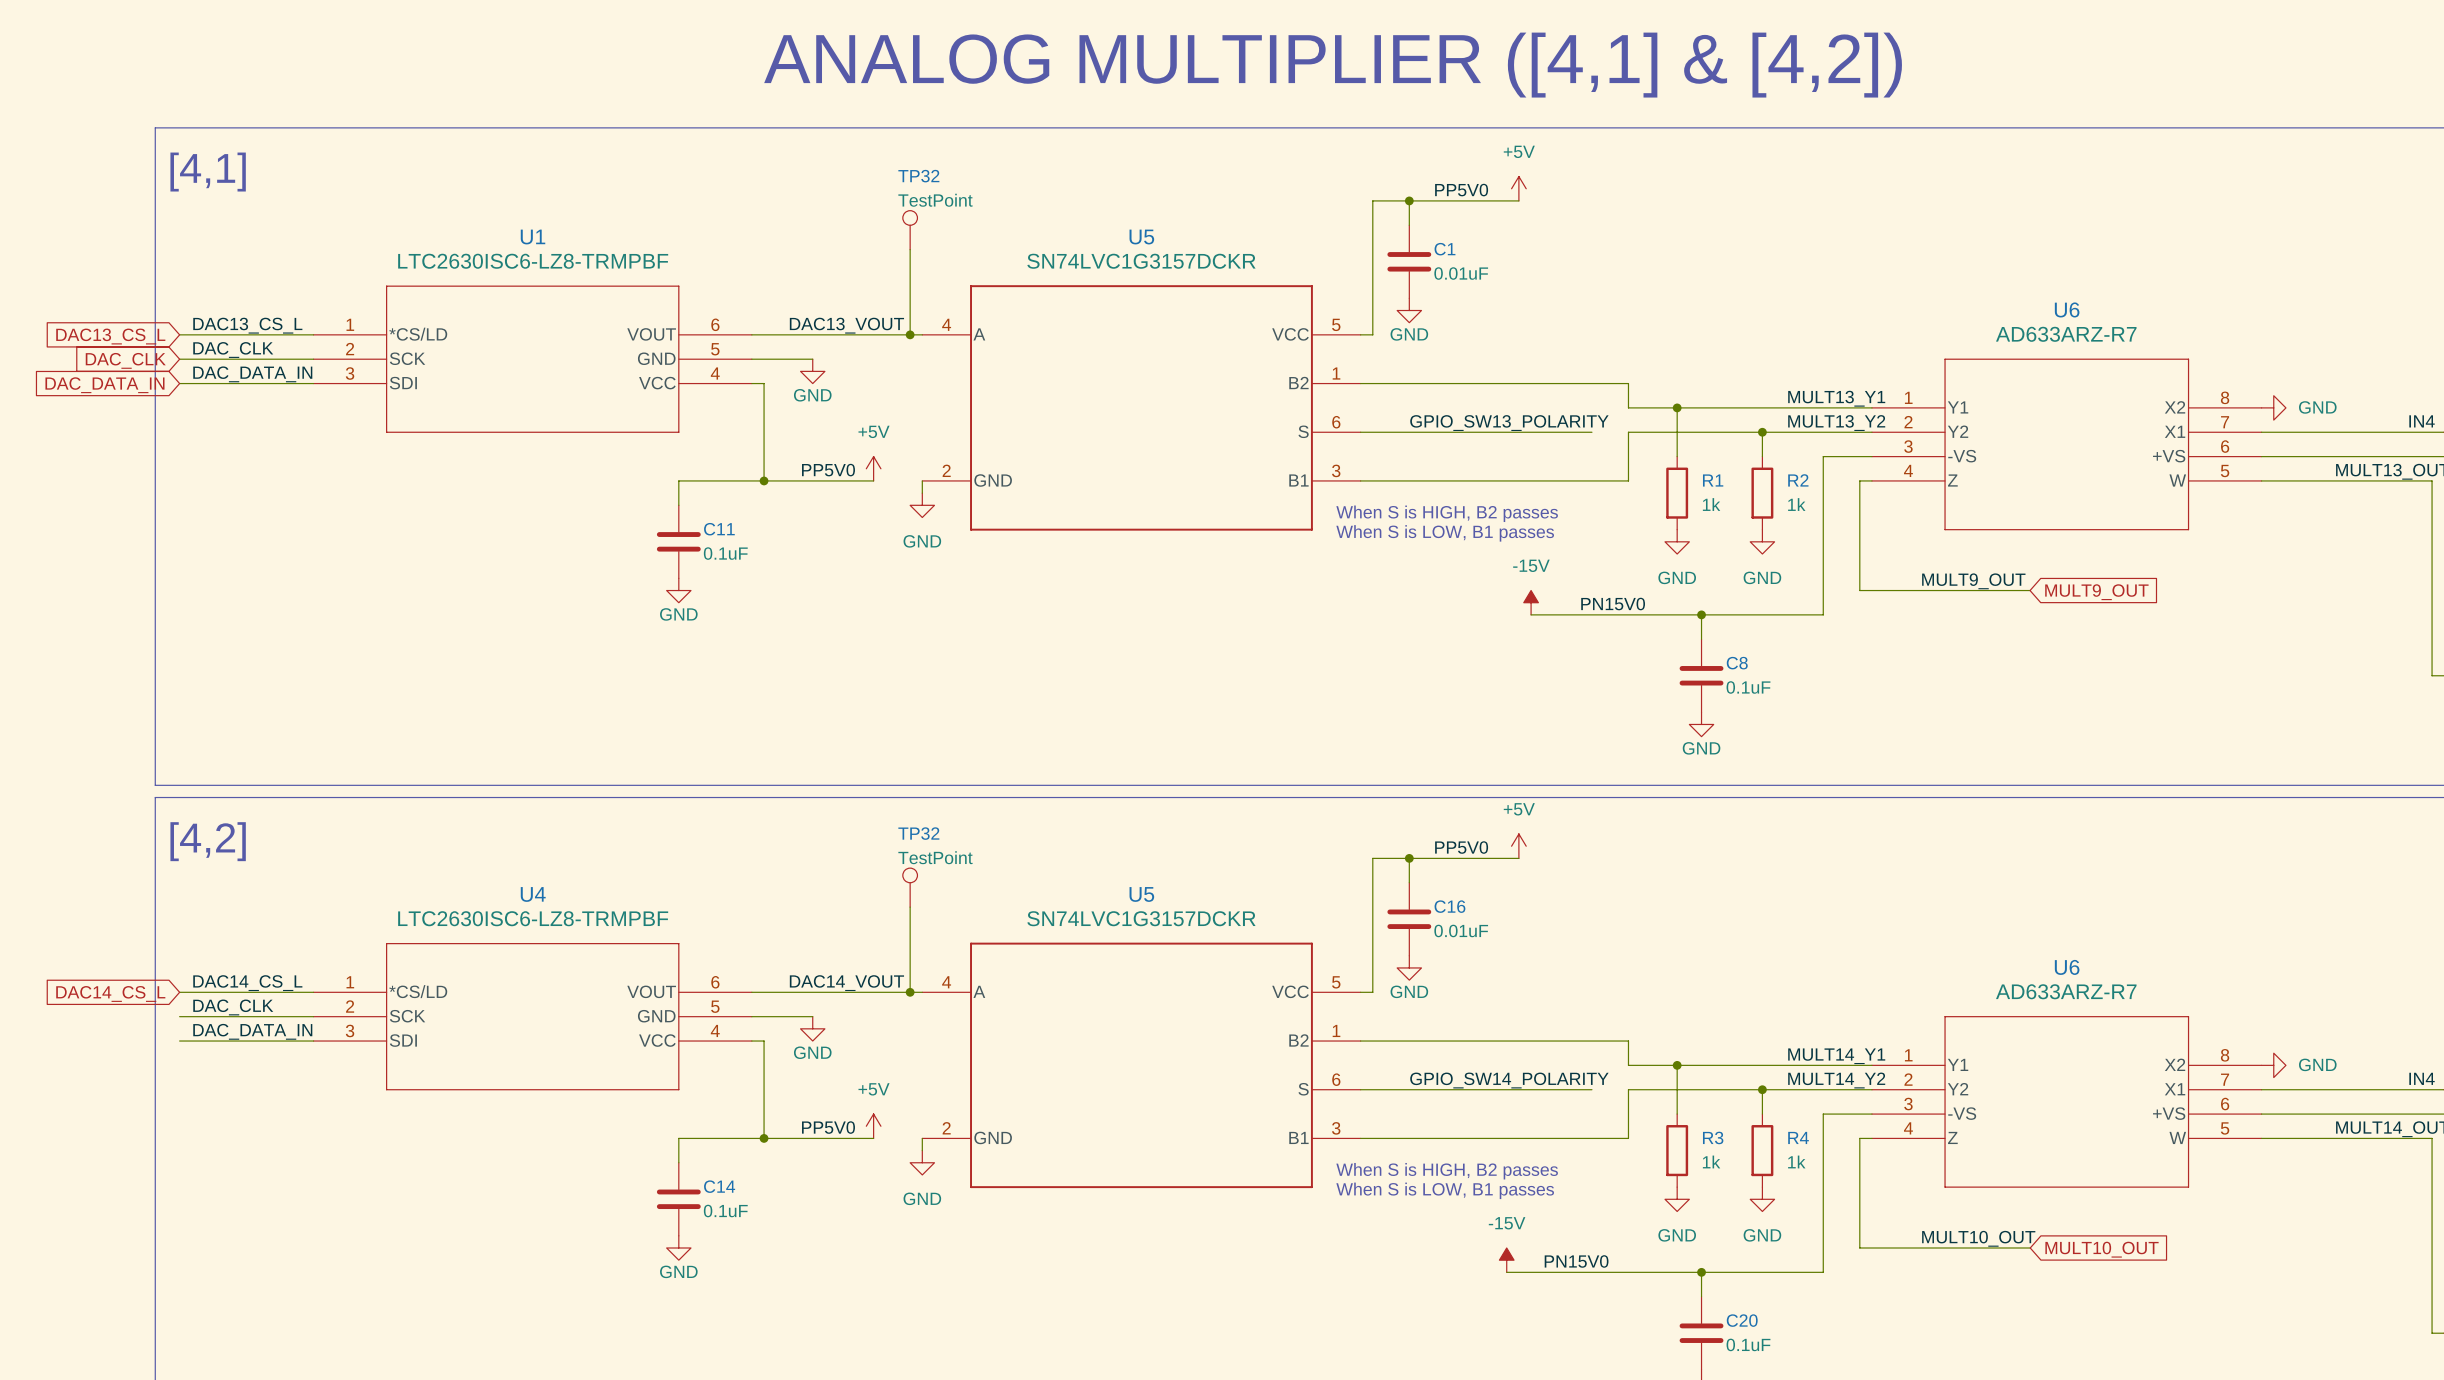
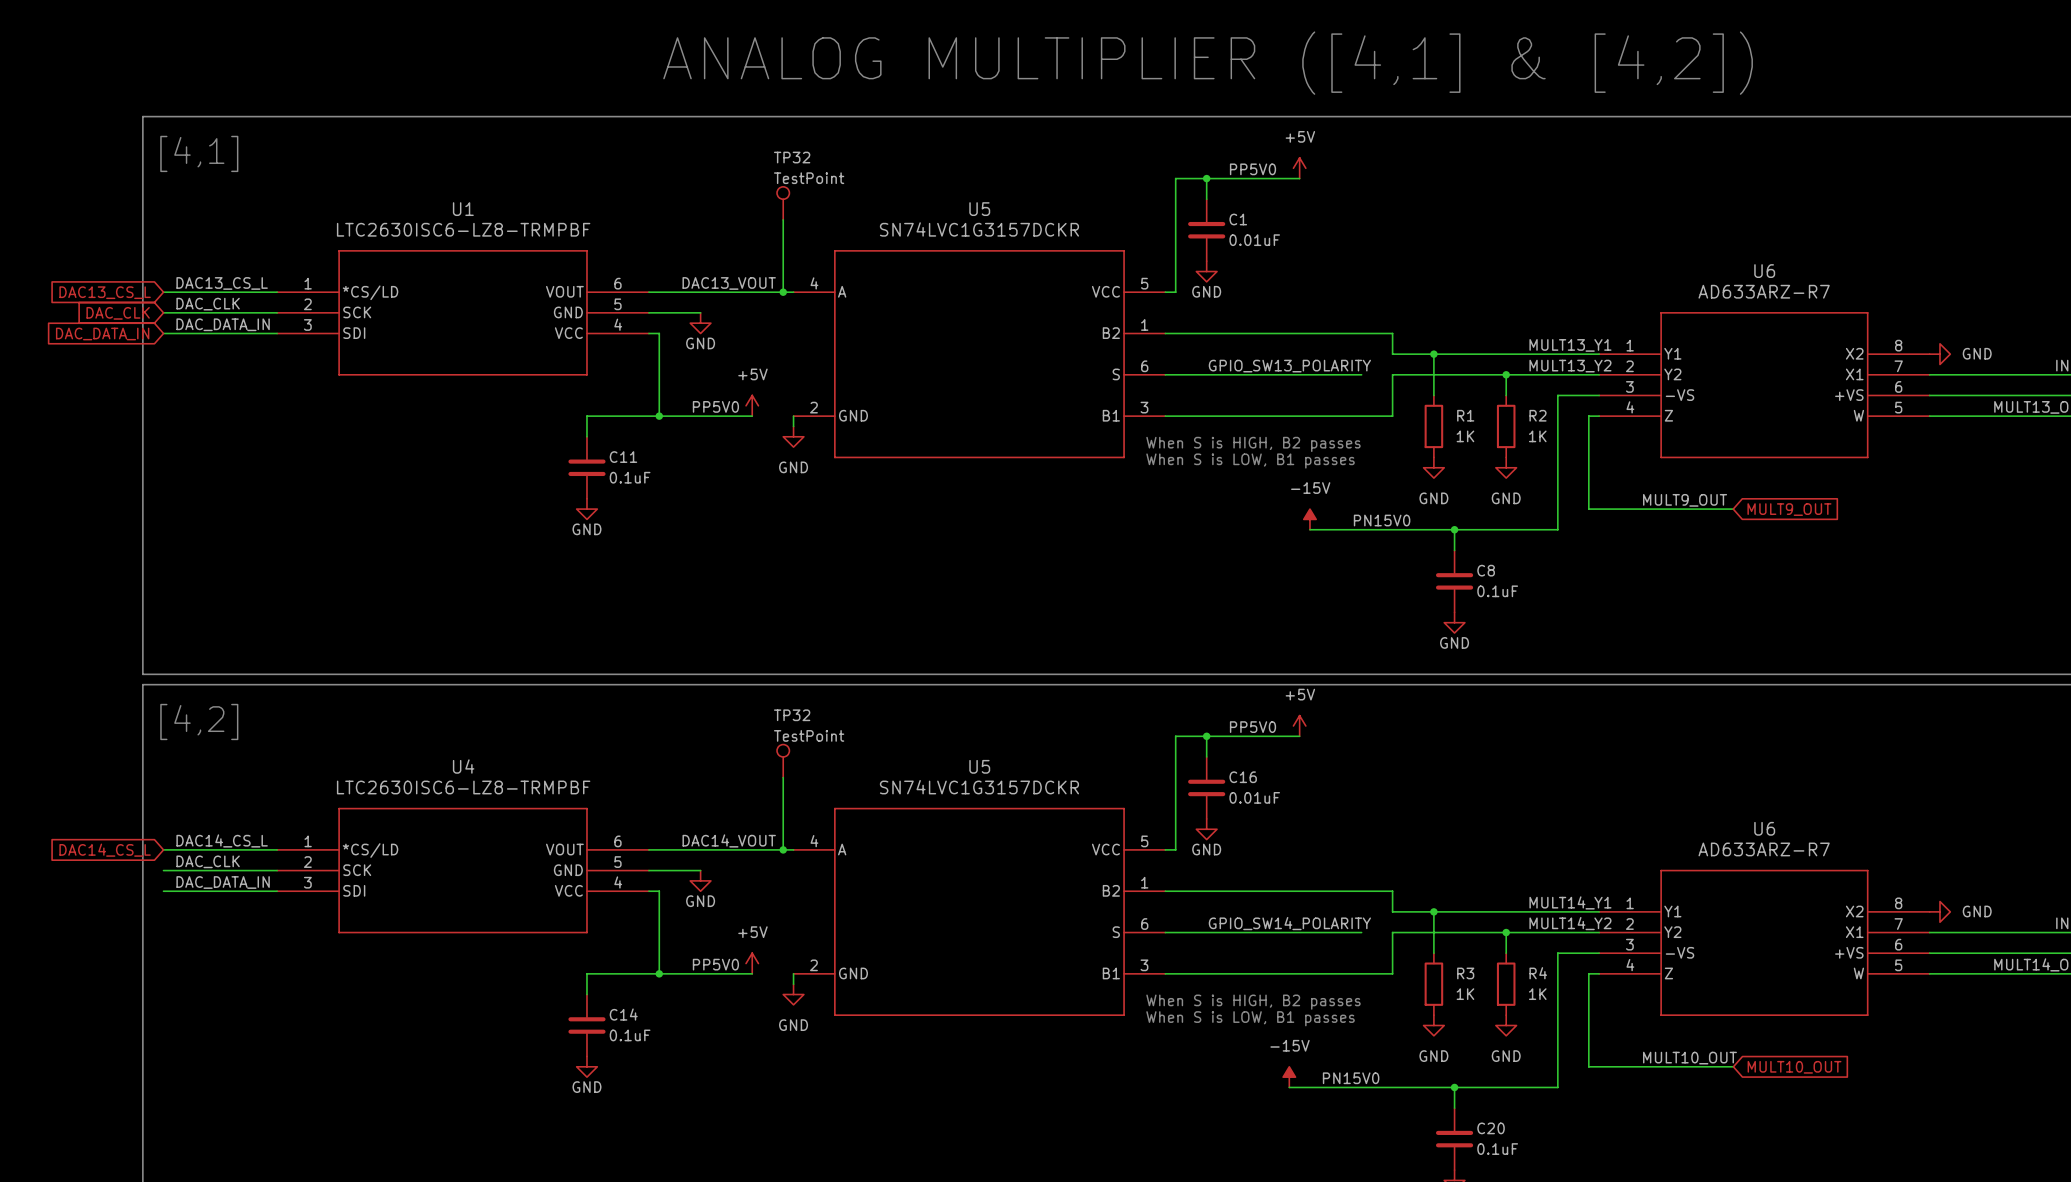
R1 value: 1k (1711, 504) -> 1K (1465, 436)
R2 value: 1k (1796, 504) -> 1K (1537, 436)
R3 value: 1k (1711, 1161) -> 1K (1465, 994)
R4 value: 1k (1796, 1161) -> 1K (1537, 994)

